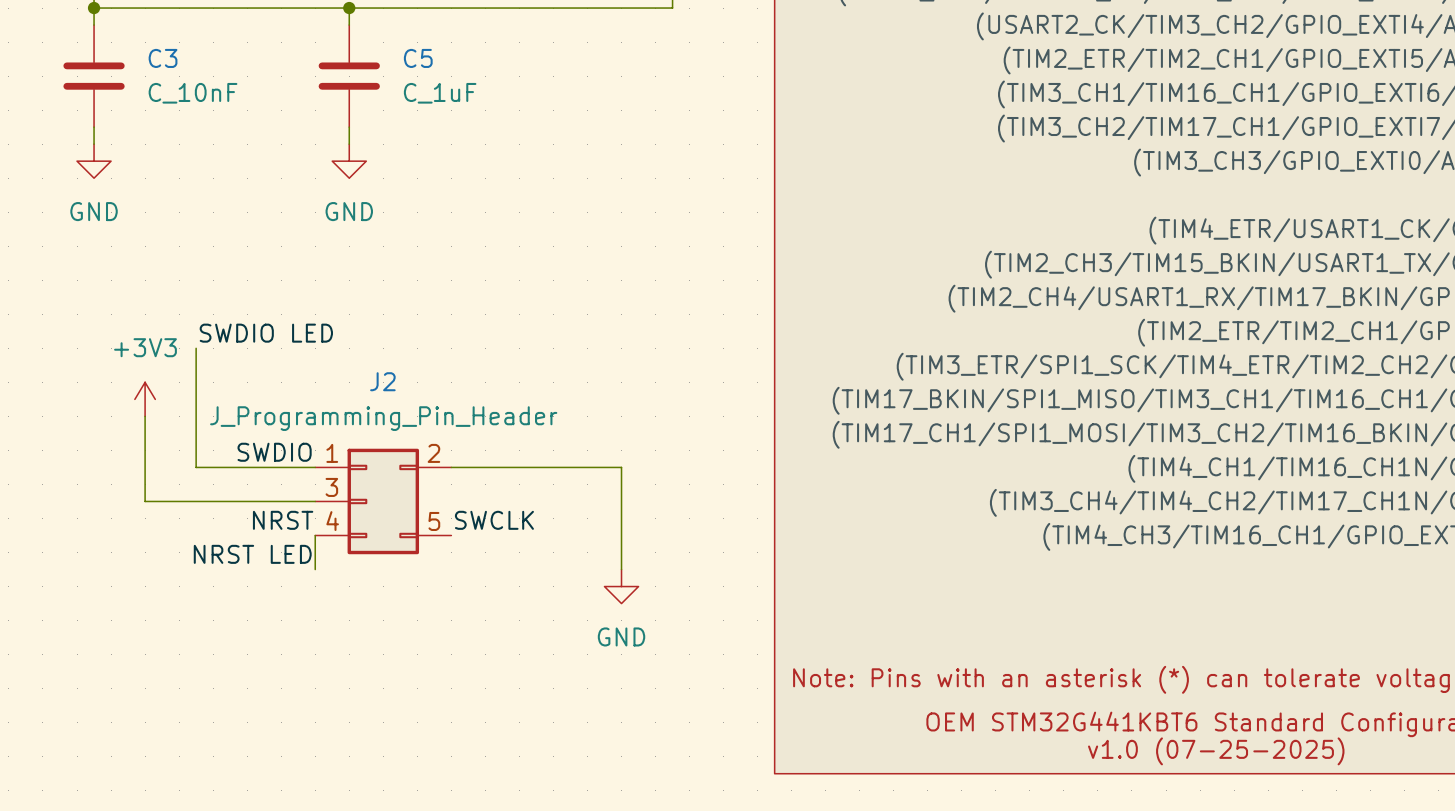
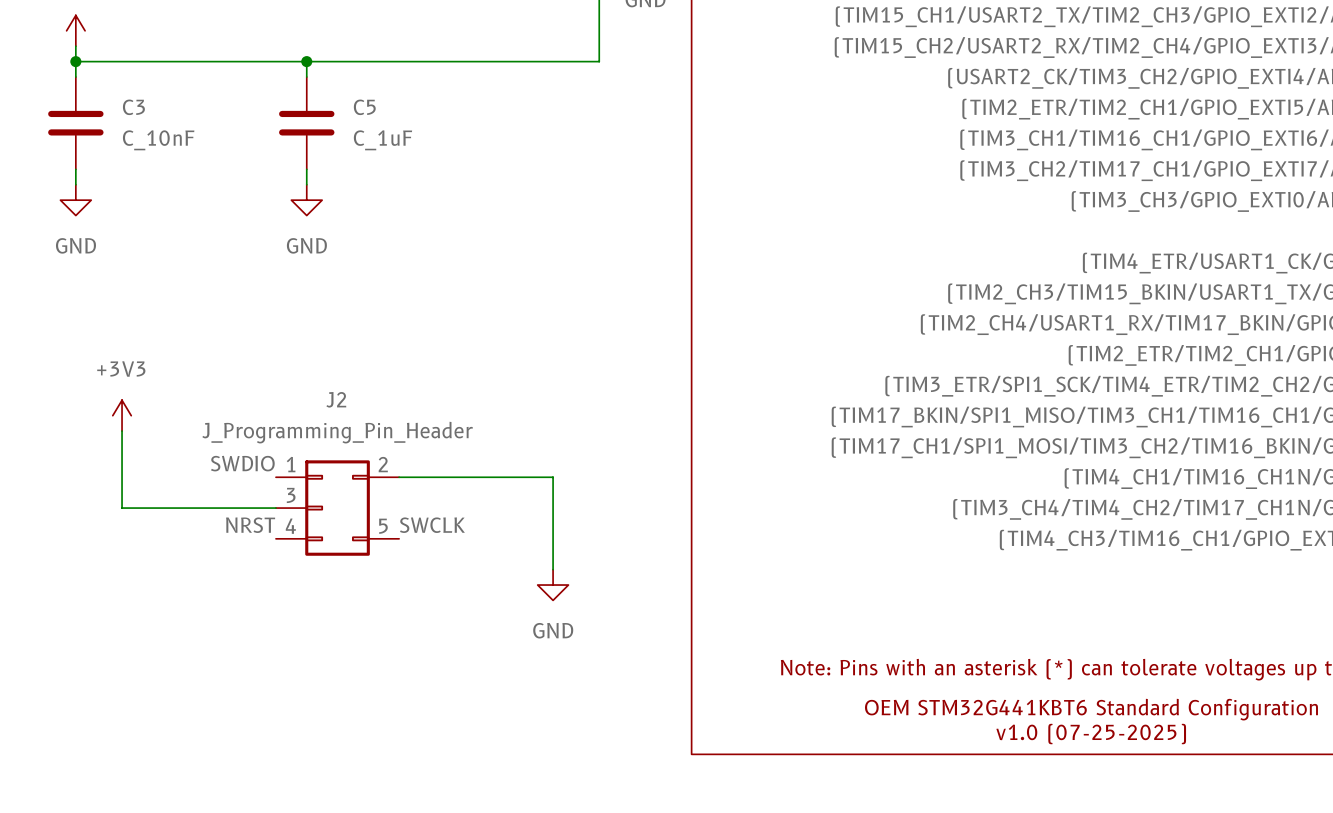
label: SWDIO LED (266, 333) -> none
wire: (196, 348) (196, 467) (315, 467) -> none
wire: (315, 535) (315, 569) -> none
label: NRST LED (252, 554) -> none

